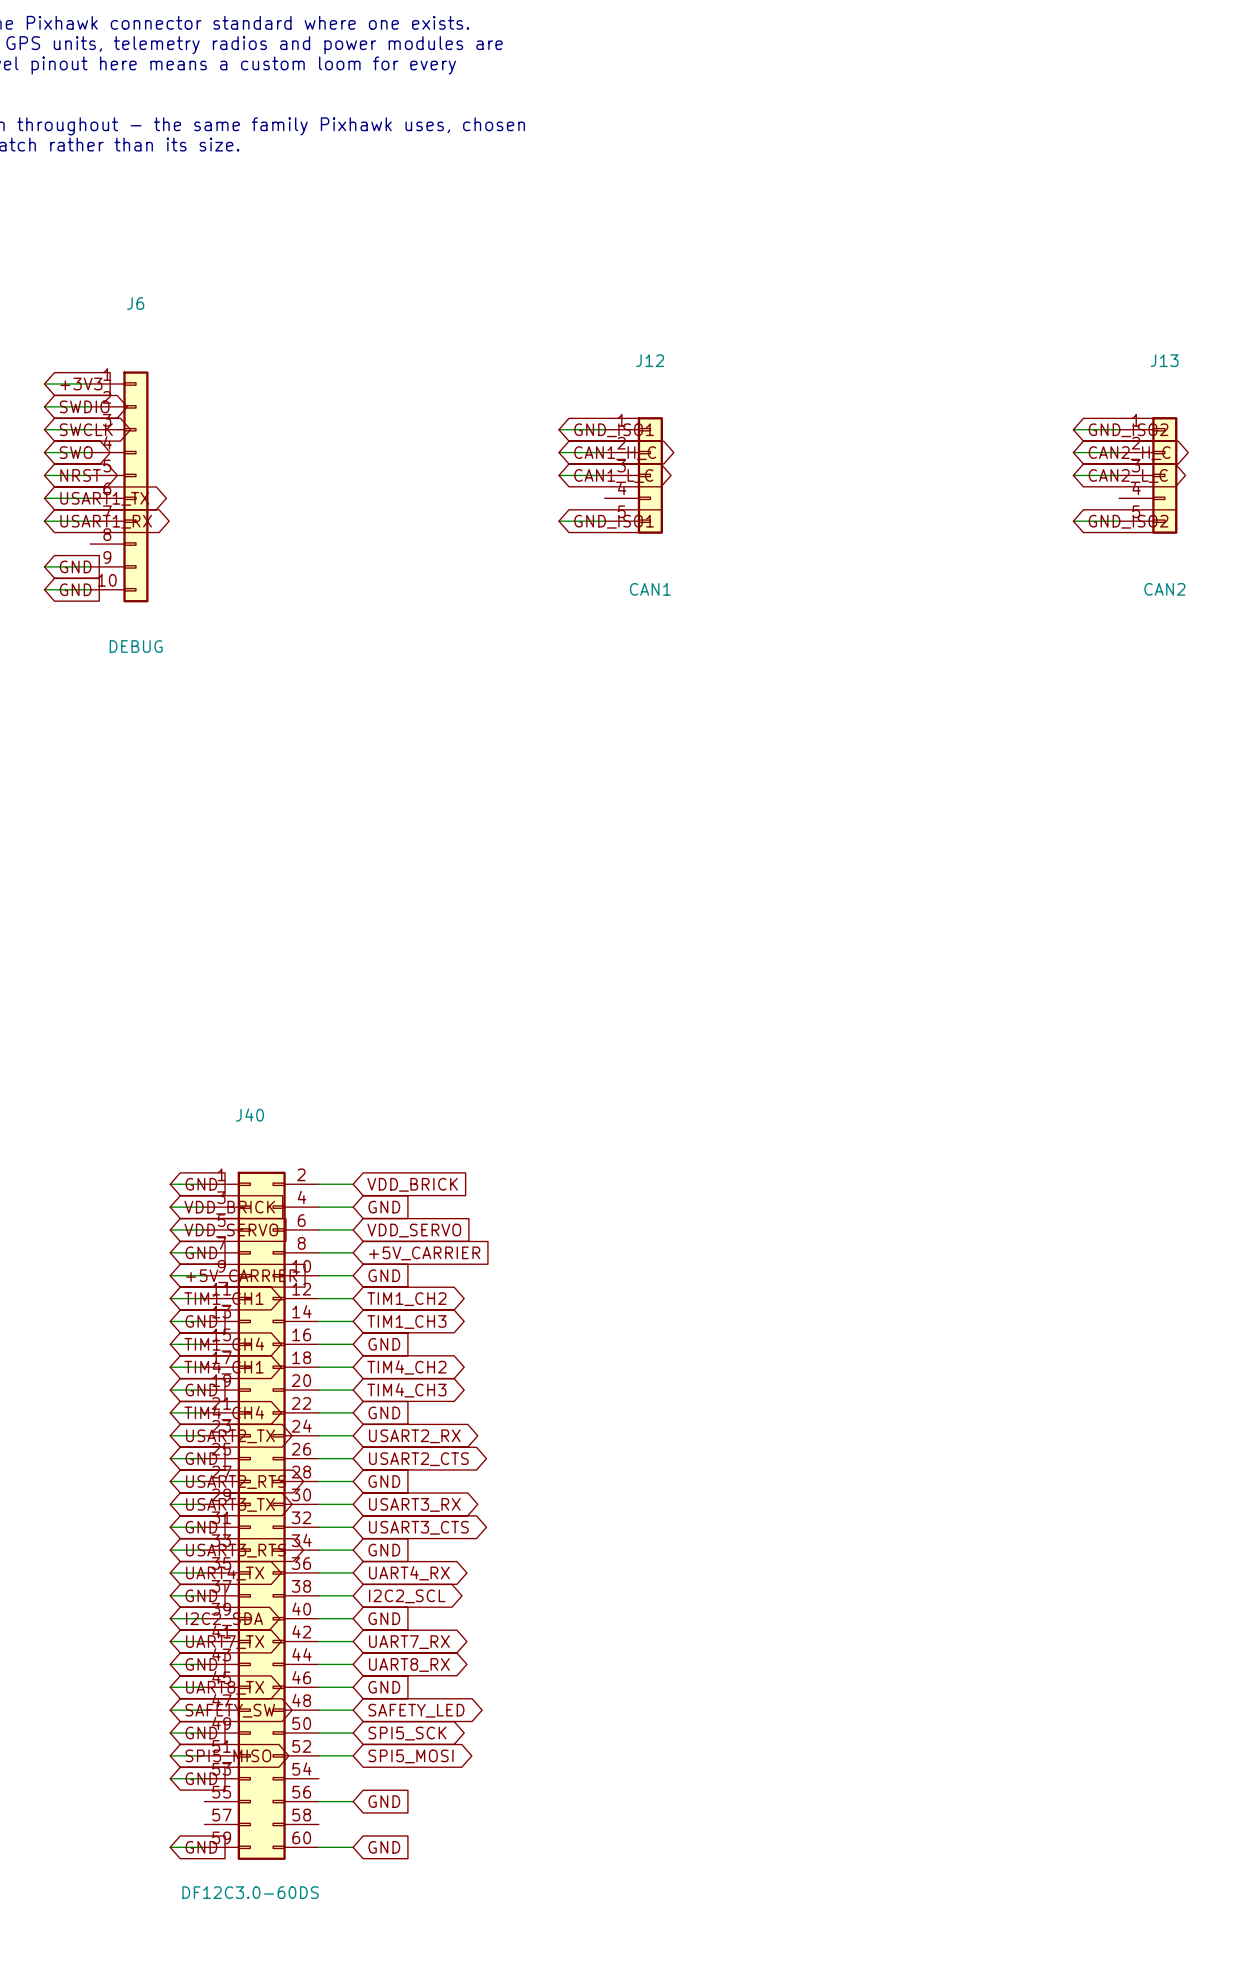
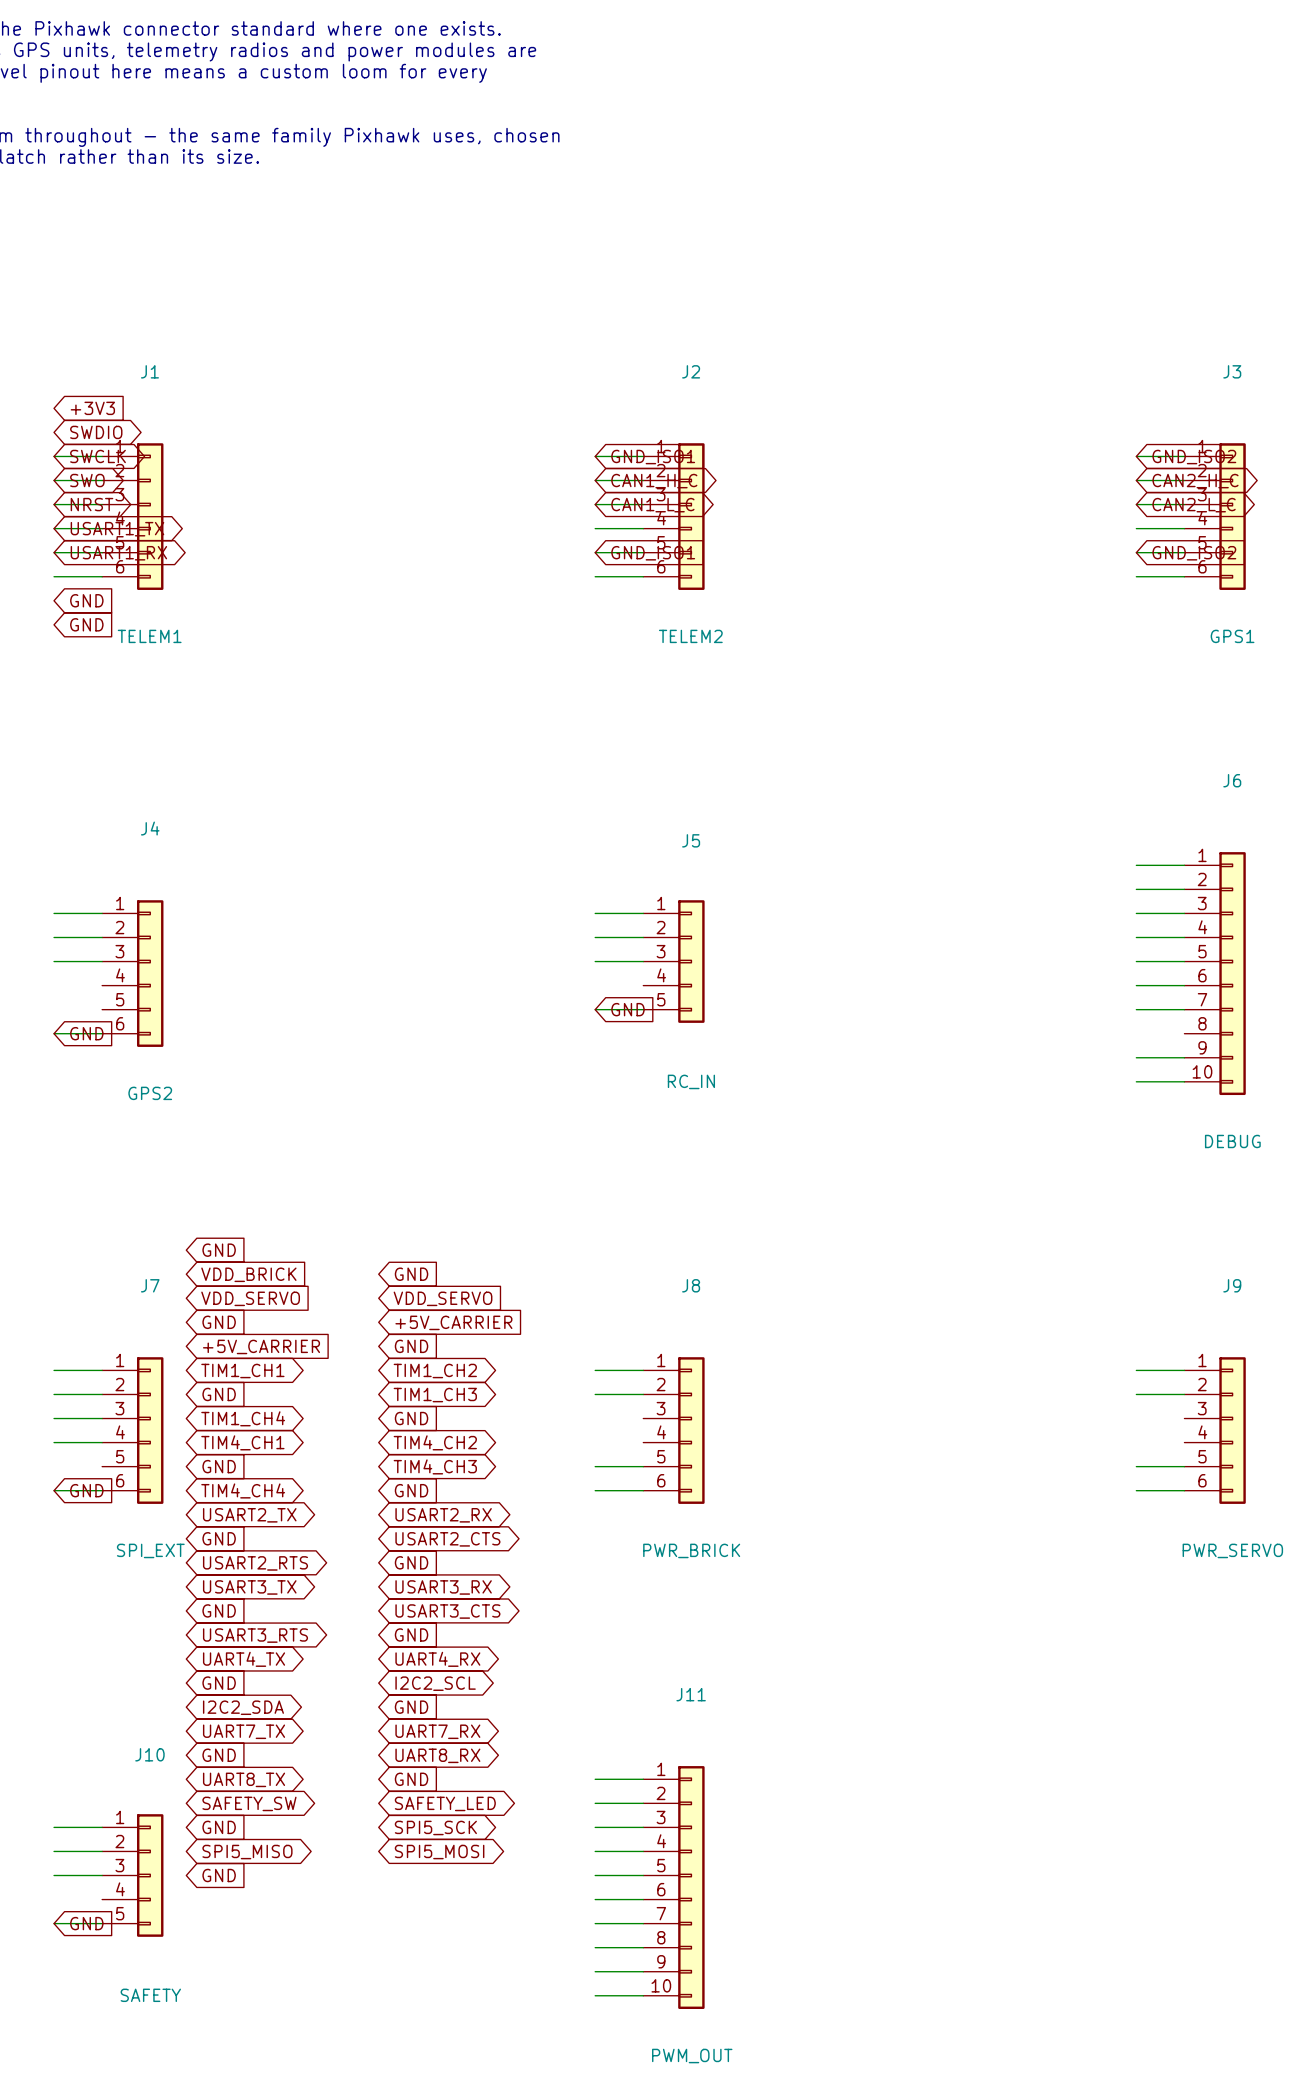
wire: (44, 384) (90, 384) -> none
wire: (44, 406) (90, 406) -> none
J12: CAN1 (633, 475) -> none
J13: CAN2 (1148, 475) -> none
J6 position: (119, 486) -> (1215, 973)
J1: none -> TELEM1 (132, 516)
J2: none -> TELEM2 (673, 516)
J3: none -> GPS1 (1215, 516)
wire: none -> (595, 528) (643, 528)
wire: none -> (1136, 528) (1184, 528)
wire: none -> (595, 576) (643, 576)
wire: none -> (1136, 576) (1184, 576)
wire: (44, 566) (90, 566) -> (54, 576) (102, 576)
wire: (44, 589) (90, 589) -> none
wire: none -> (1136, 865) (1184, 865)
wire: none -> (1136, 889) (1184, 889)
wire: none -> (54, 913) (102, 913)
wire: none -> (595, 913) (643, 913)
wire: none -> (1136, 913) (1184, 913)
wire: none -> (54, 937) (102, 937)
wire: none -> (595, 937) (643, 937)
wire: none -> (1136, 937) (1184, 937)
wire: none -> (54, 961) (102, 961)
wire: none -> (595, 961) (643, 961)
J5: none -> RC_IN (673, 961)
wire: none -> (1136, 961) (1184, 961)
J4: none -> GPS2 (132, 973)
wire: none -> (1136, 985) (1184, 985)
wire: none -> (595, 1009) (643, 1009)
global label: none -> GND (627, 1009)
wire: none -> (1136, 1009) (1184, 1009)
wire: none -> (54, 1033) (102, 1033)
global label: none -> GND (86, 1033)
wire: none -> (1136, 1057) (1184, 1057)
wire: none -> (1136, 1081) (1184, 1081)
wire: (170, 1184) (204, 1184) -> none
wire: (318, 1184) (353, 1184) -> none
global label: VDD_BRICK (412, 1184) -> none
wire: (170, 1207) (204, 1207) -> none
wire: (318, 1207) (353, 1207) -> none
wire: (170, 1229) (204, 1229) -> none
wire: (318, 1229) (353, 1229) -> none
wire: (170, 1252) (204, 1252) -> none
wire: (318, 1252) (353, 1252) -> none
wire: (170, 1275) (204, 1275) -> none
wire: (318, 1275) (353, 1275) -> none
wire: none -> (54, 1370) (102, 1370)
wire: (170, 1298) (204, 1298) -> none
wire: (318, 1298) (353, 1298) -> none
wire: none -> (595, 1370) (643, 1370)
wire: none -> (1136, 1370) (1184, 1370)
wire: none -> (54, 1394) (102, 1394)
wire: (170, 1321) (204, 1321) -> none
wire: (318, 1321) (353, 1321) -> none
wire: none -> (595, 1394) (643, 1394)
wire: none -> (1136, 1394) (1184, 1394)
wire: none -> (54, 1418) (102, 1418)
wire: (170, 1344) (204, 1344) -> none
wire: (318, 1344) (353, 1344) -> none
J7: none -> SPI_EXT (132, 1430)
J8: none -> PWR_BRICK (673, 1430)
J9: none -> PWR_SERVO (1215, 1430)
wire: none -> (54, 1442) (102, 1442)
wire: (170, 1367) (204, 1367) -> none
wire: (318, 1367) (353, 1367) -> none
wire: (170, 1390) (204, 1390) -> none
wire: (318, 1390) (353, 1390) -> none
wire: none -> (595, 1466) (643, 1466)
wire: none -> (1136, 1466) (1184, 1466)
wire: none -> (54, 1490) (102, 1490)
global label: none -> GND (86, 1490)
wire: (170, 1412) (204, 1412) -> none
wire: (318, 1412) (353, 1412) -> none
wire: none -> (595, 1490) (643, 1490)
wire: none -> (1136, 1490) (1184, 1490)
wire: (170, 1435) (204, 1435) -> none
wire: (318, 1435) (353, 1435) -> none
wire: (170, 1458) (204, 1458) -> none
wire: (318, 1458) (353, 1458) -> none
wire: (170, 1481) (204, 1481) -> none
wire: (318, 1481) (353, 1481) -> none
wire: (170, 1504) (204, 1504) -> none
wire: (318, 1504) (353, 1504) -> none
J40: DF12C3.0-60DS (261, 1515) -> none
wire: (170, 1527) (204, 1527) -> none
wire: (318, 1527) (353, 1527) -> none
wire: (170, 1550) (204, 1550) -> none
wire: (318, 1550) (353, 1550) -> none
wire: (170, 1572) (204, 1572) -> none
wire: (318, 1572) (353, 1572) -> none
wire: (170, 1595) (204, 1595) -> none
wire: (318, 1595) (353, 1595) -> none
wire: (170, 1618) (204, 1618) -> none
wire: (318, 1618) (353, 1618) -> none
wire: (170, 1641) (204, 1641) -> none
wire: (318, 1641) (353, 1641) -> none
wire: (170, 1664) (204, 1664) -> none
wire: (318, 1664) (353, 1664) -> none
wire: (170, 1687) (204, 1687) -> none
wire: (318, 1687) (353, 1687) -> none
wire: none -> (595, 1779) (643, 1779)
wire: (170, 1710) (204, 1710) -> none
wire: (318, 1710) (353, 1710) -> none
wire: none -> (595, 1803) (643, 1803)
wire: none -> (54, 1827) (102, 1827)
wire: (170, 1733) (204, 1733) -> none
wire: (318, 1733) (353, 1733) -> none
wire: none -> (595, 1827) (643, 1827)
wire: none -> (54, 1851) (102, 1851)
wire: (170, 1755) (204, 1755) -> none
wire: (318, 1755) (353, 1755) -> none
wire: none -> (595, 1851) (643, 1851)
wire: none -> (54, 1875) (102, 1875)
J10: none -> SAFETY (132, 1875)
wire: (170, 1778) (204, 1778) -> none
wire: none -> (595, 1875) (643, 1875)
J11: none -> PWM_OUT (673, 1887)
wire: (318, 1801) (353, 1801) -> none
global label: GND (384, 1801) -> none
wire: none -> (595, 1899) (643, 1899)
wire: none -> (54, 1923) (102, 1923)
wire: none -> (595, 1923) (643, 1923)
wire: (170, 1847) (204, 1847) -> none
global label position: GND (201, 1847) -> GND (86, 1923)
wire: (318, 1847) (353, 1847) -> none
global label: GND (384, 1847) -> none
wire: none -> (595, 1947) (643, 1947)
wire: none -> (595, 1971) (643, 1971)
wire: none -> (595, 1995) (643, 1995)

